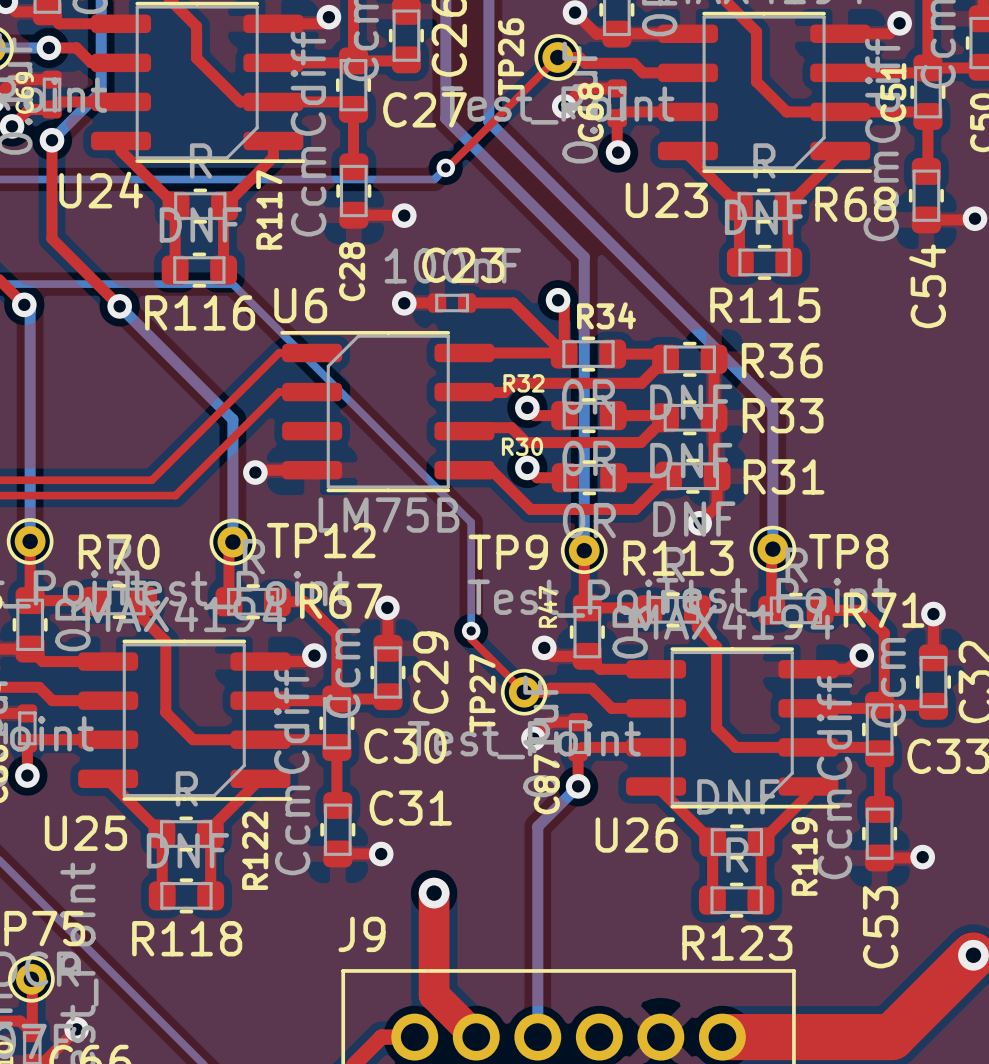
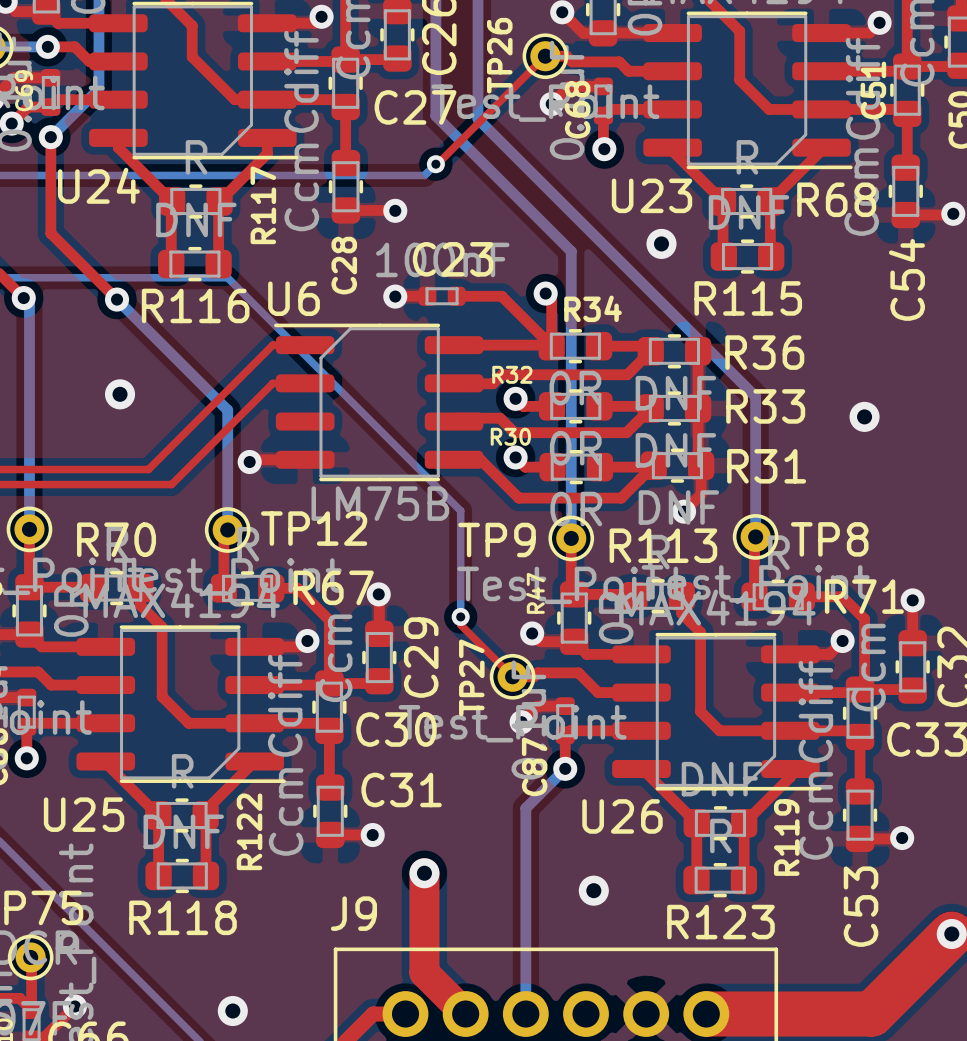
via: none -> (661, 243)
via: none -> (120, 394)
via: none -> (864, 416)
via: none -> (593, 890)
via: none -> (232, 1011)

